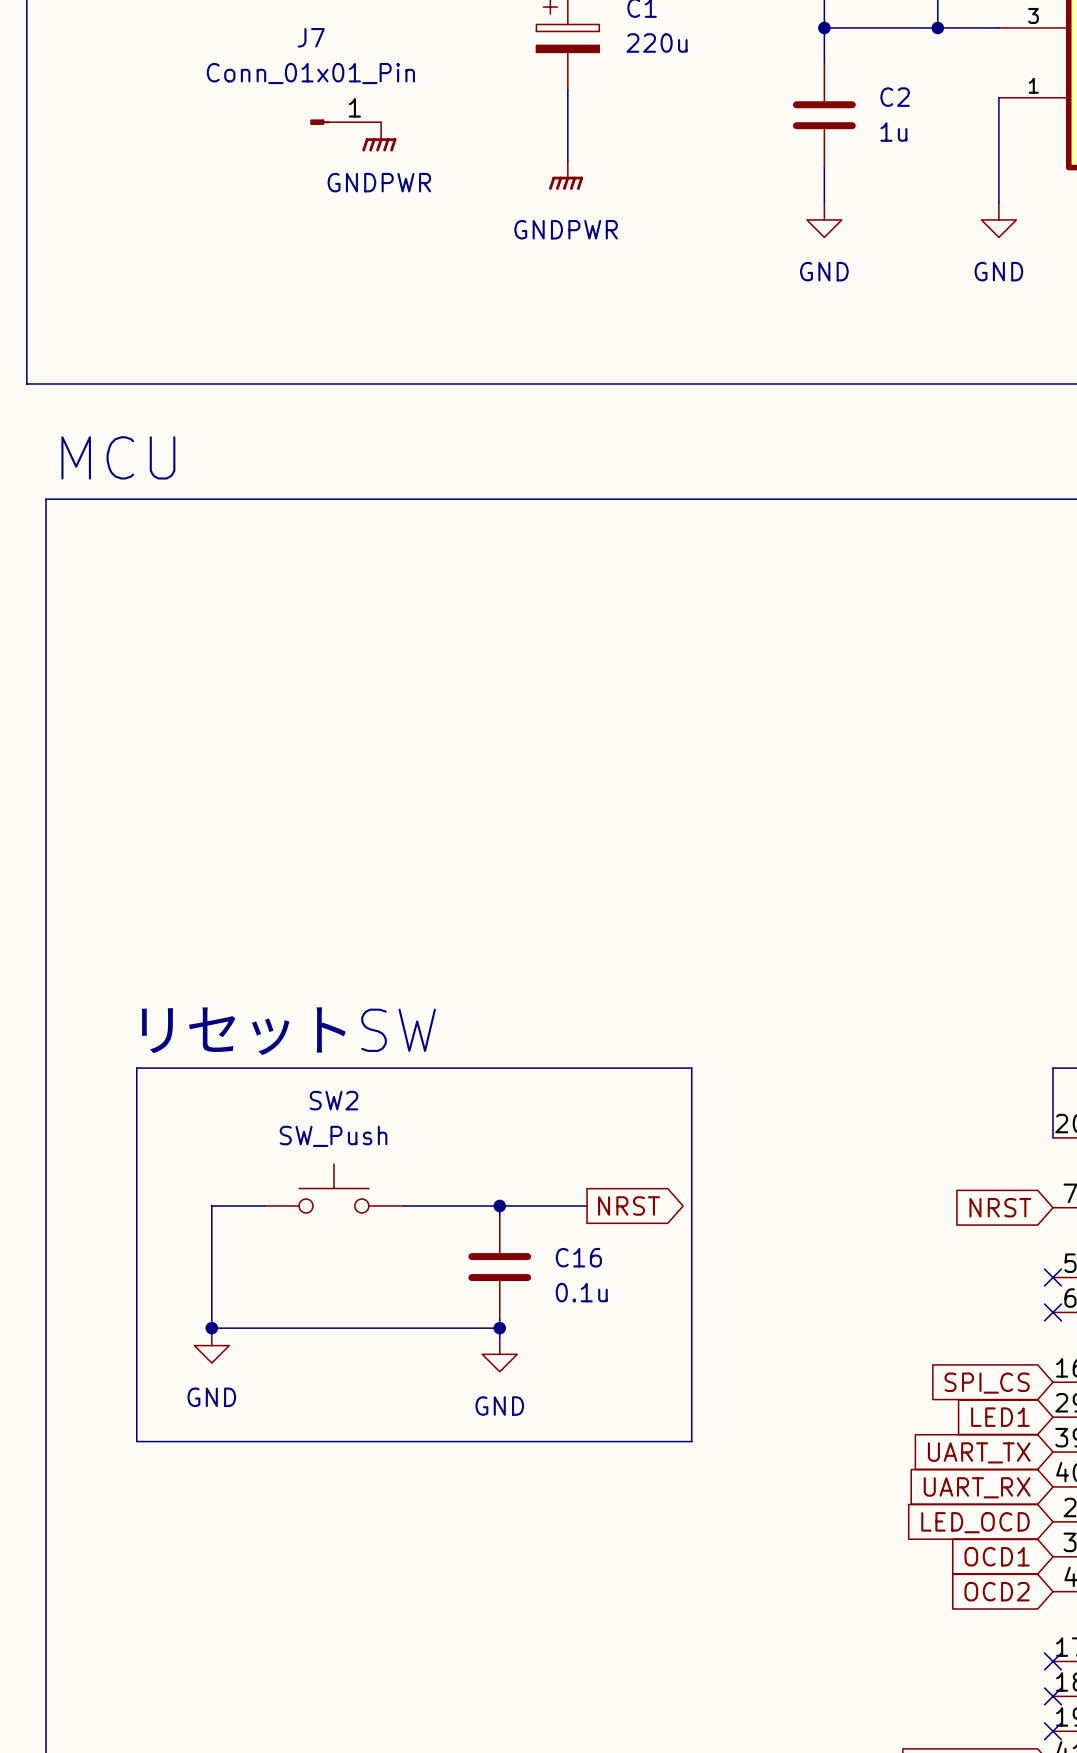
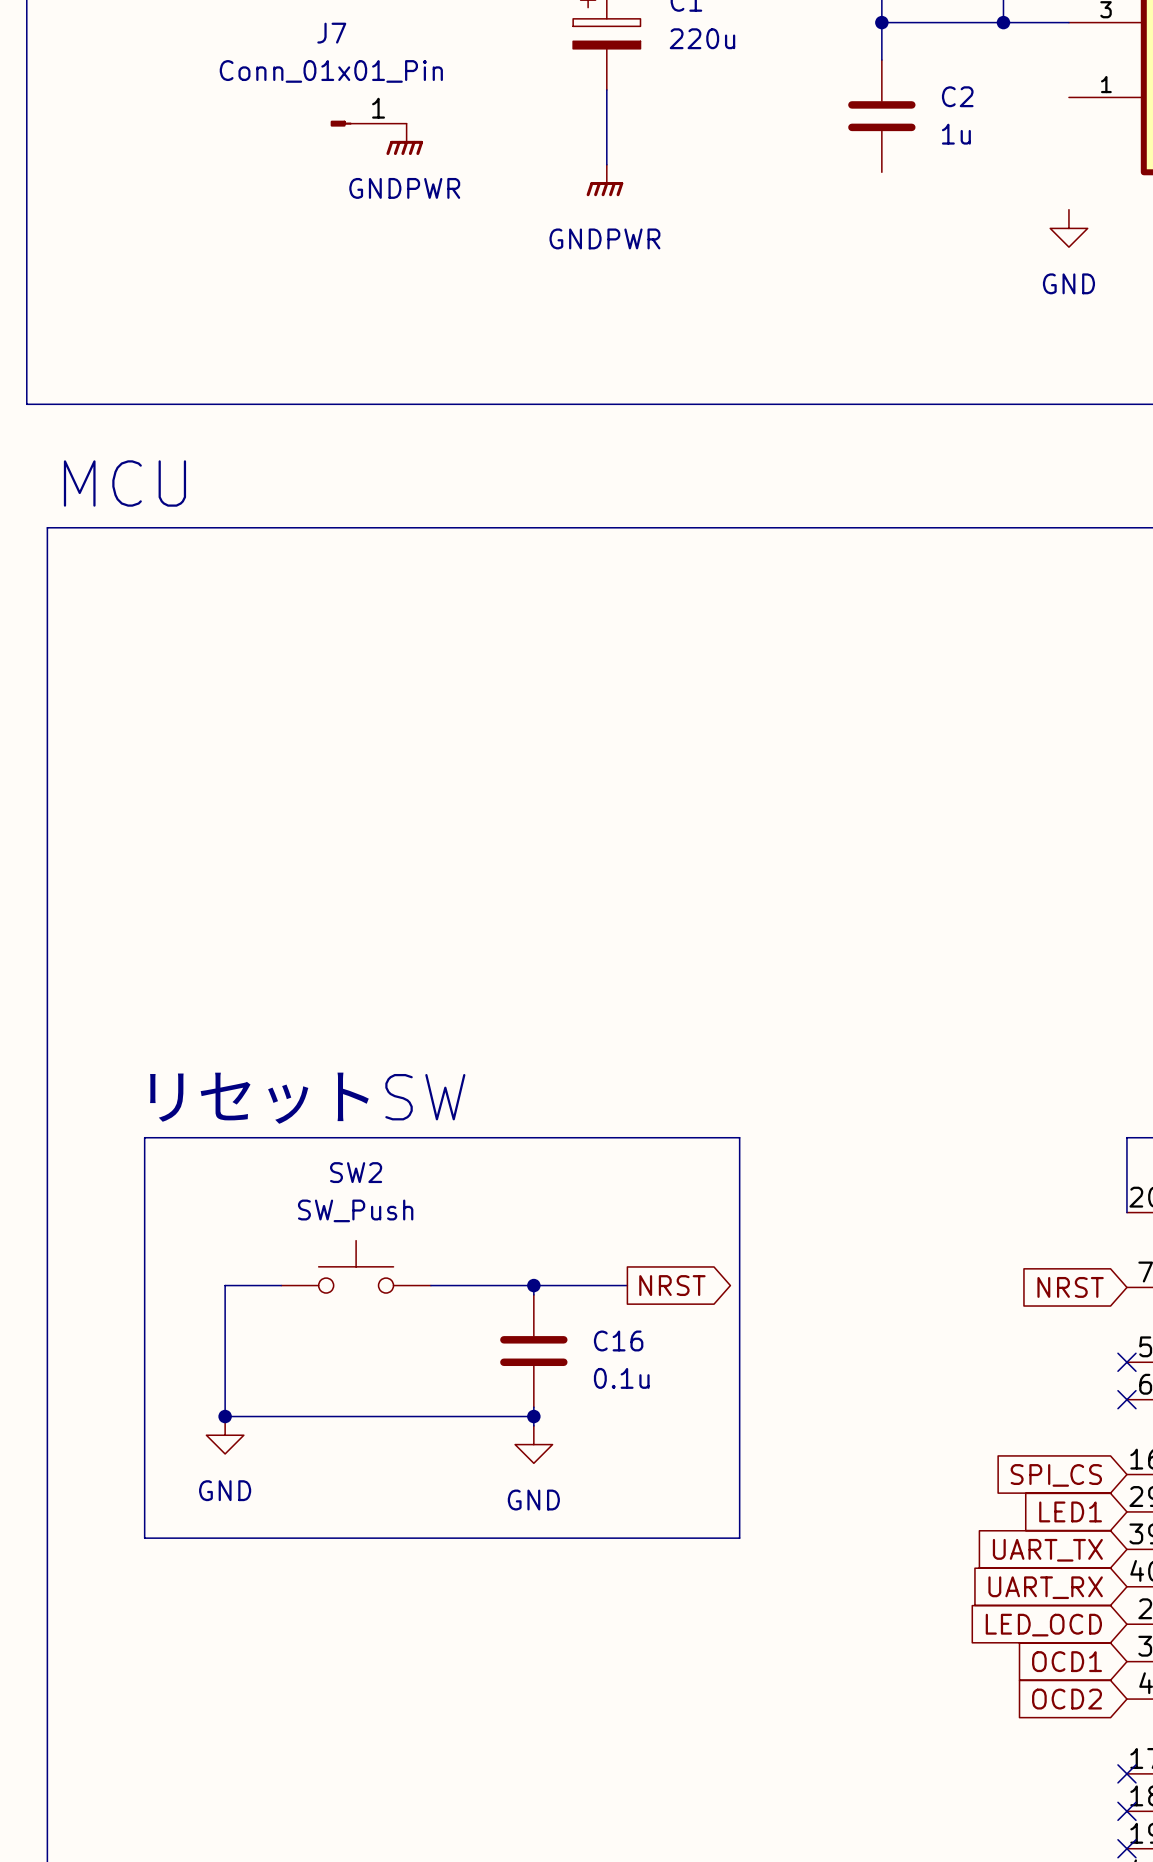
wire: (998, 97) (998, 202) -> none
wire: (824, 167) (824, 202) -> none
power symbol: GND (824, 219) -> none

